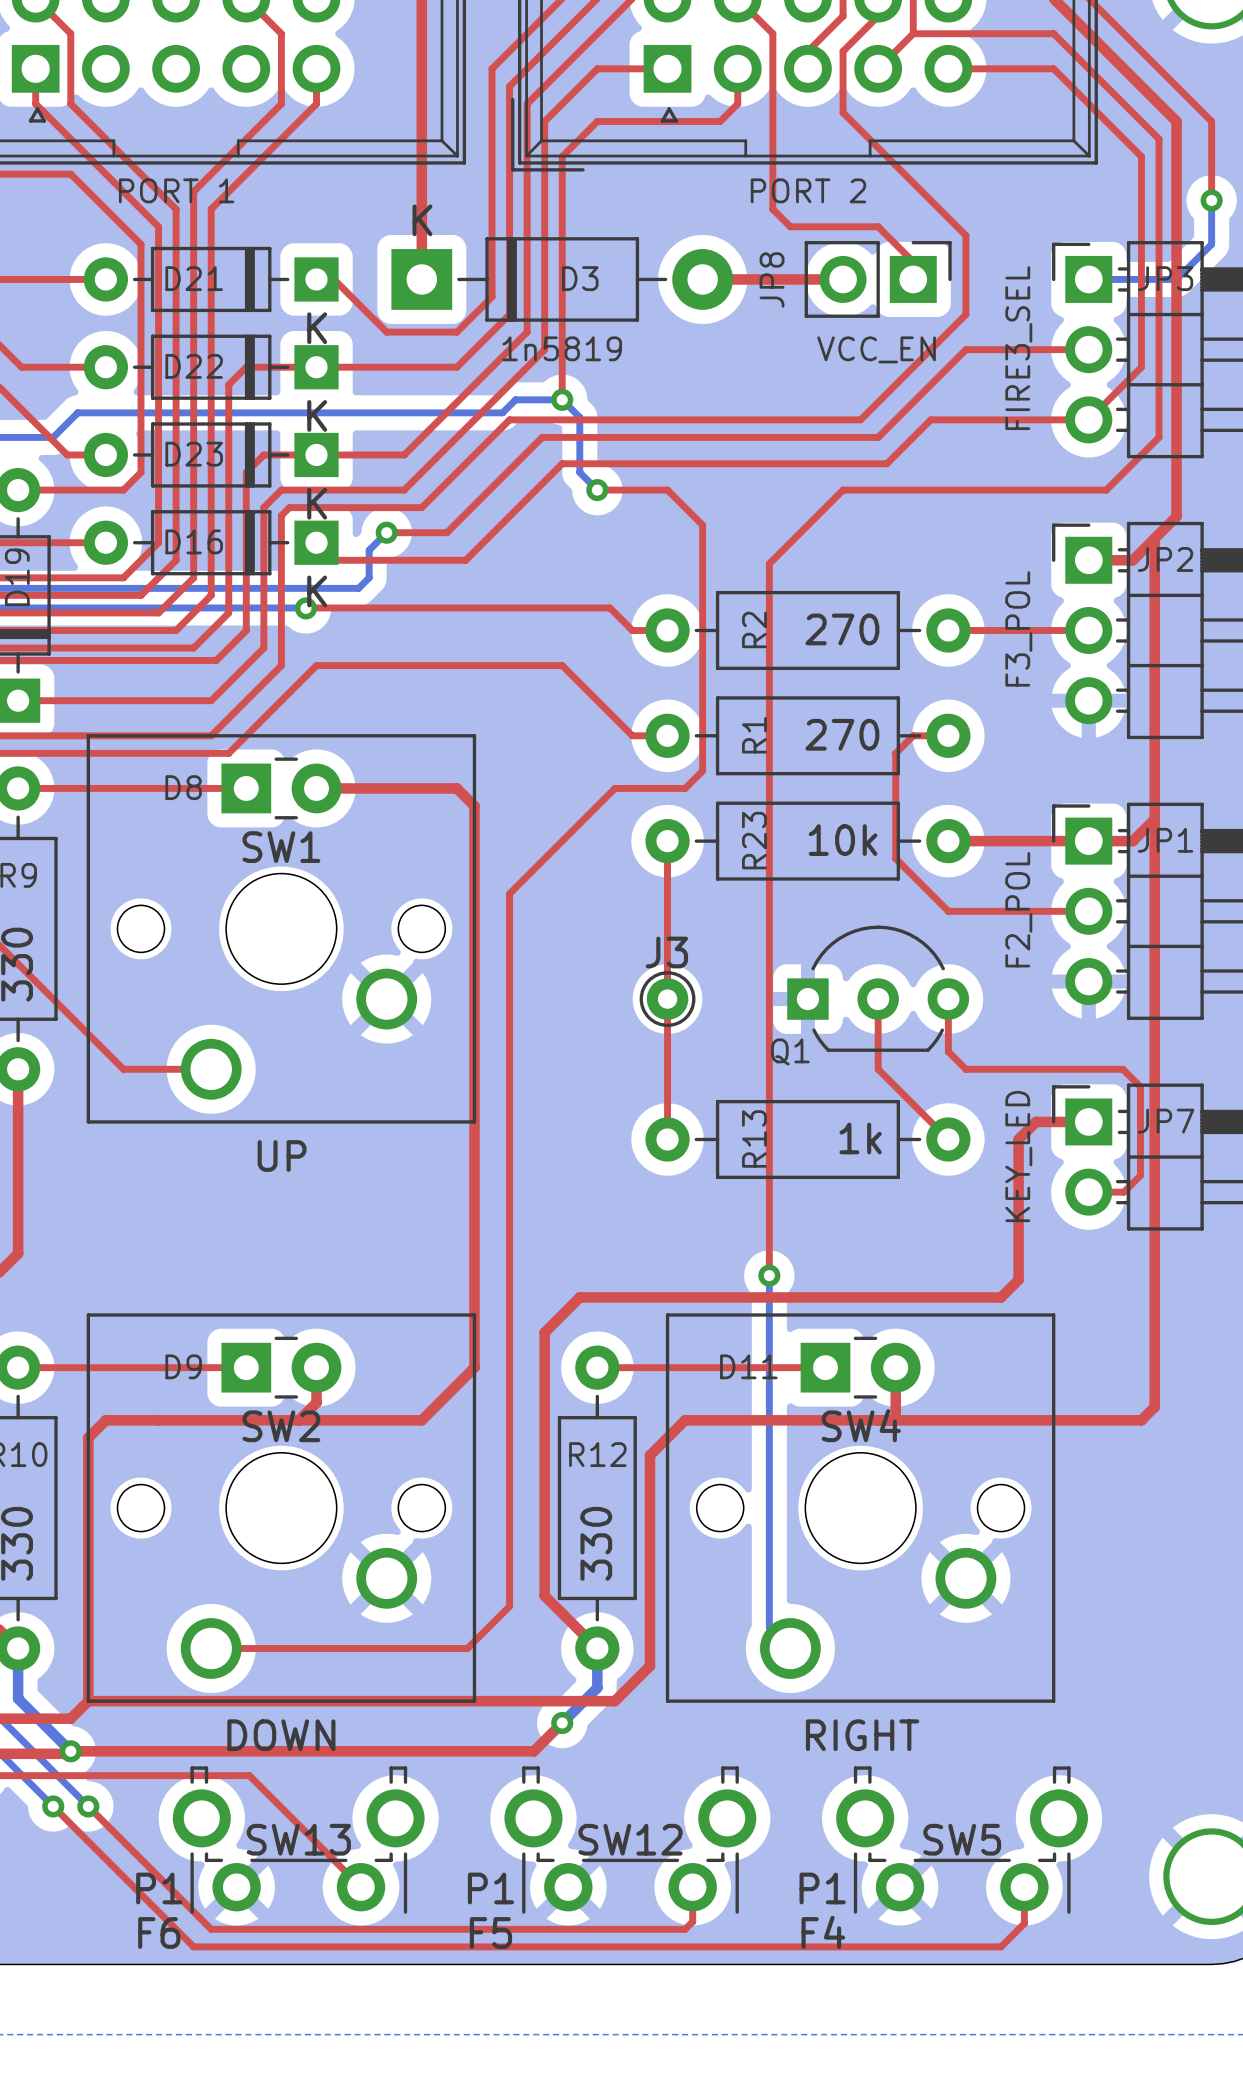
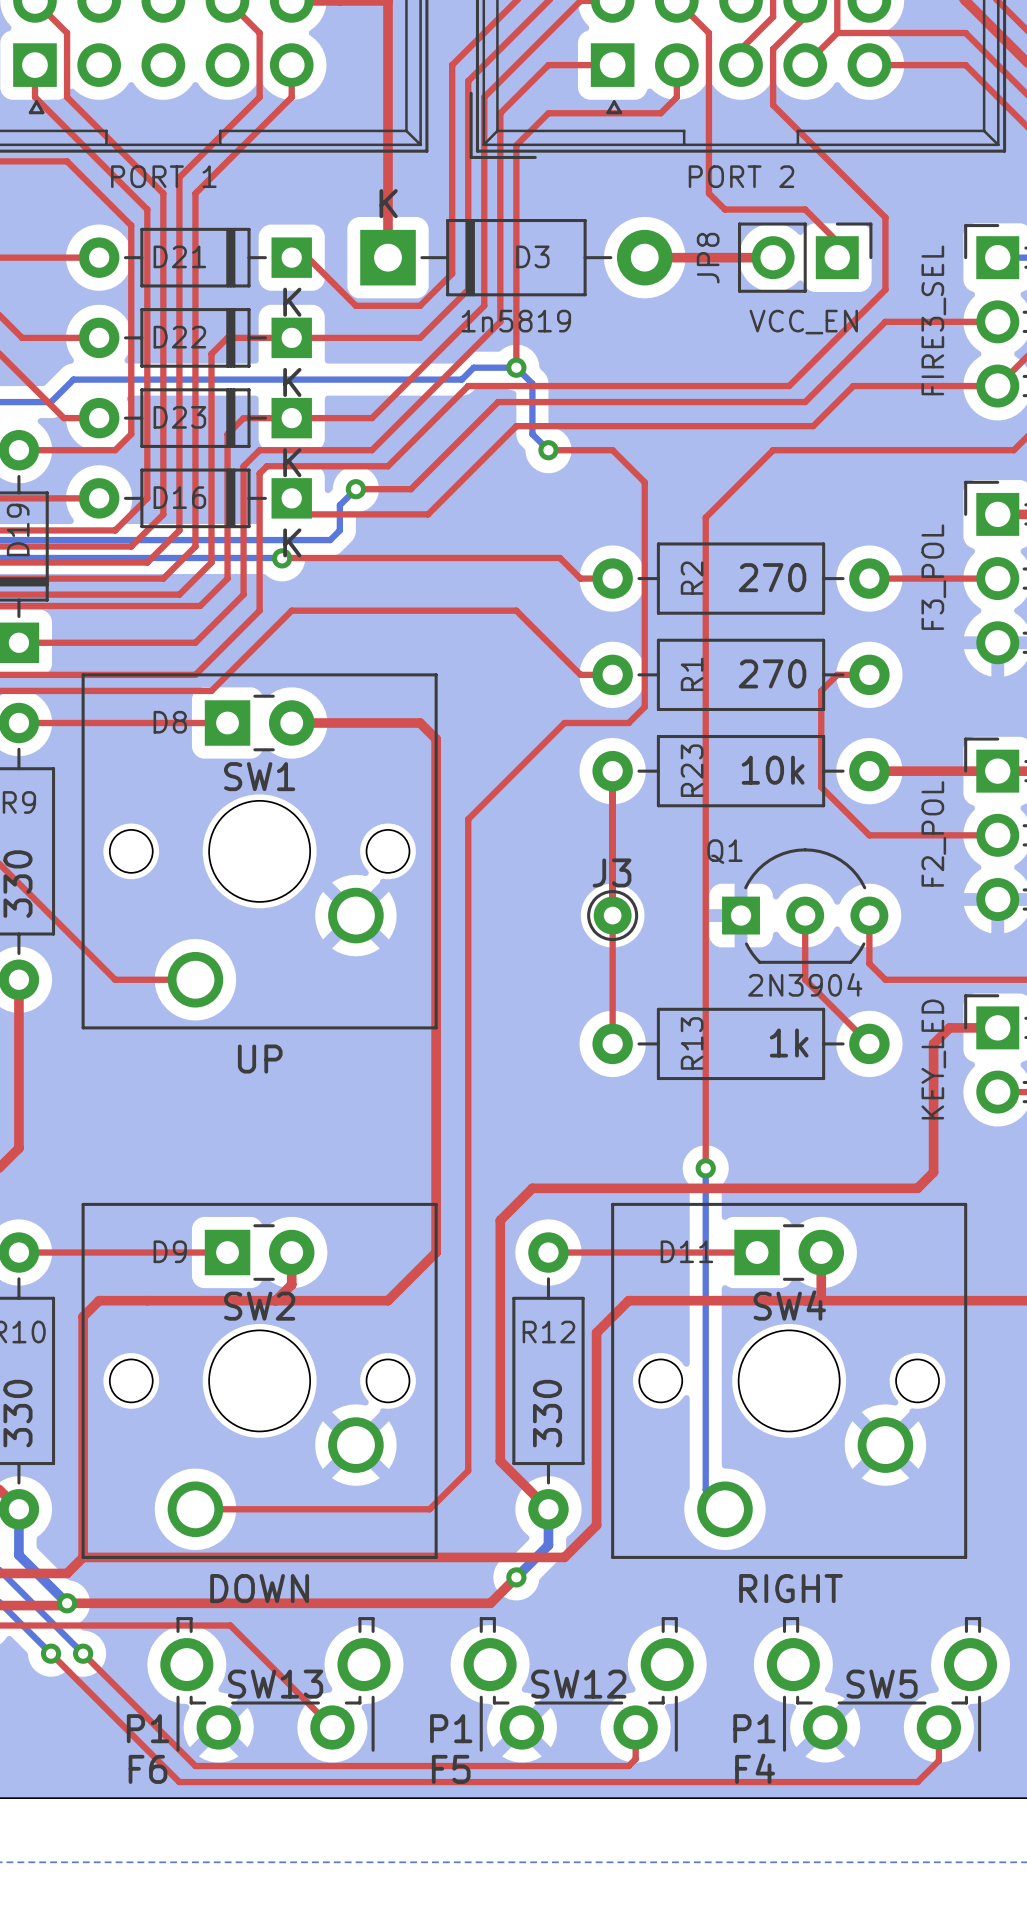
Q1 name position: Q1 (790, 1051) -> Q1 (724, 851)
Q1 value: none -> 2N3904 (805, 984)

